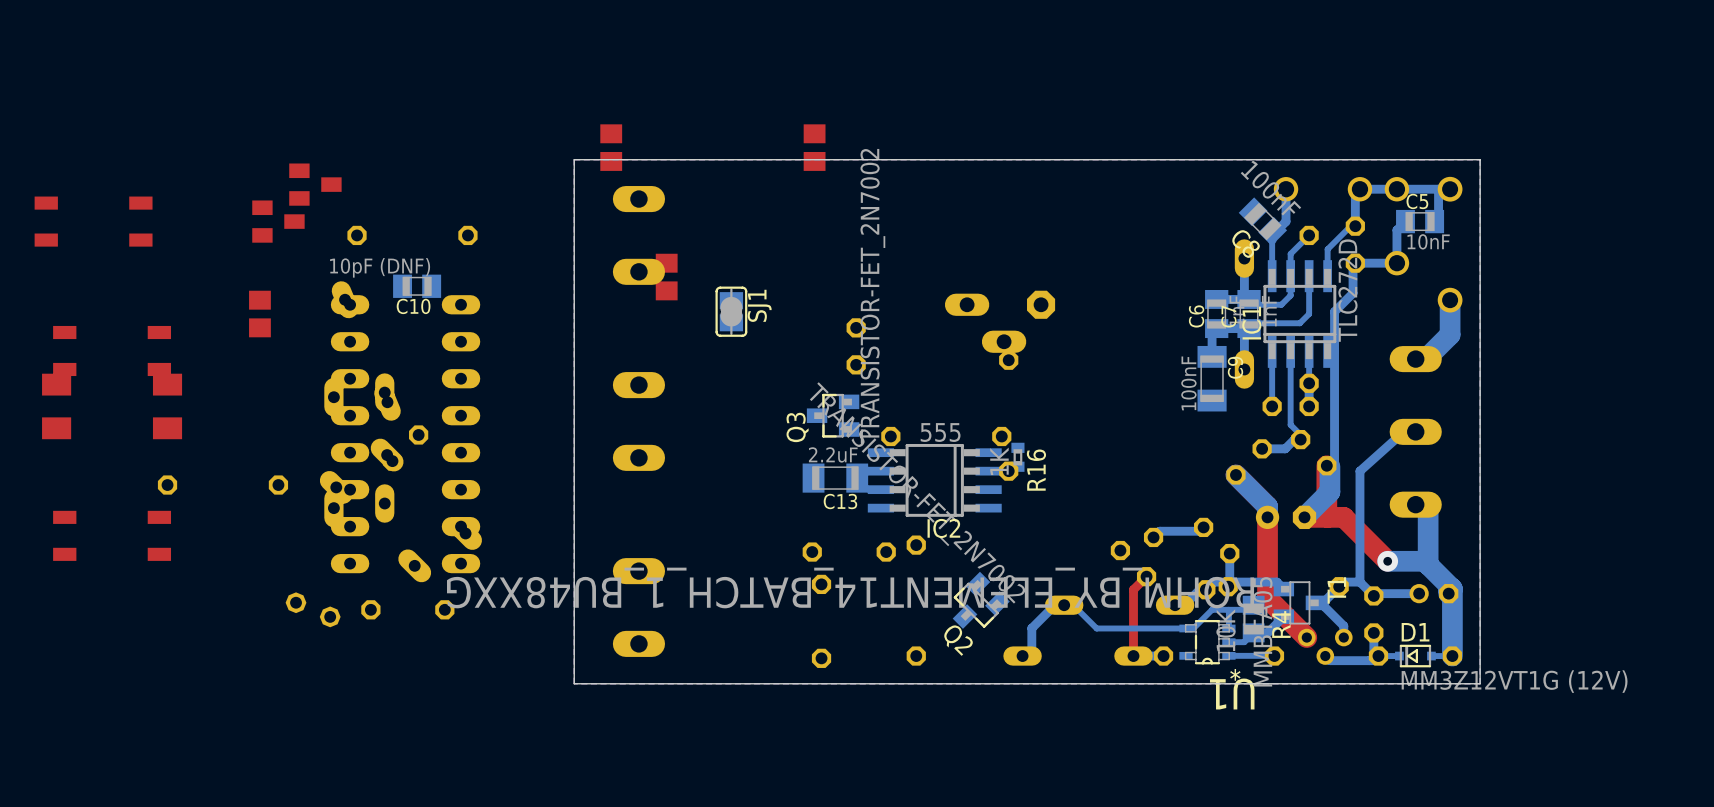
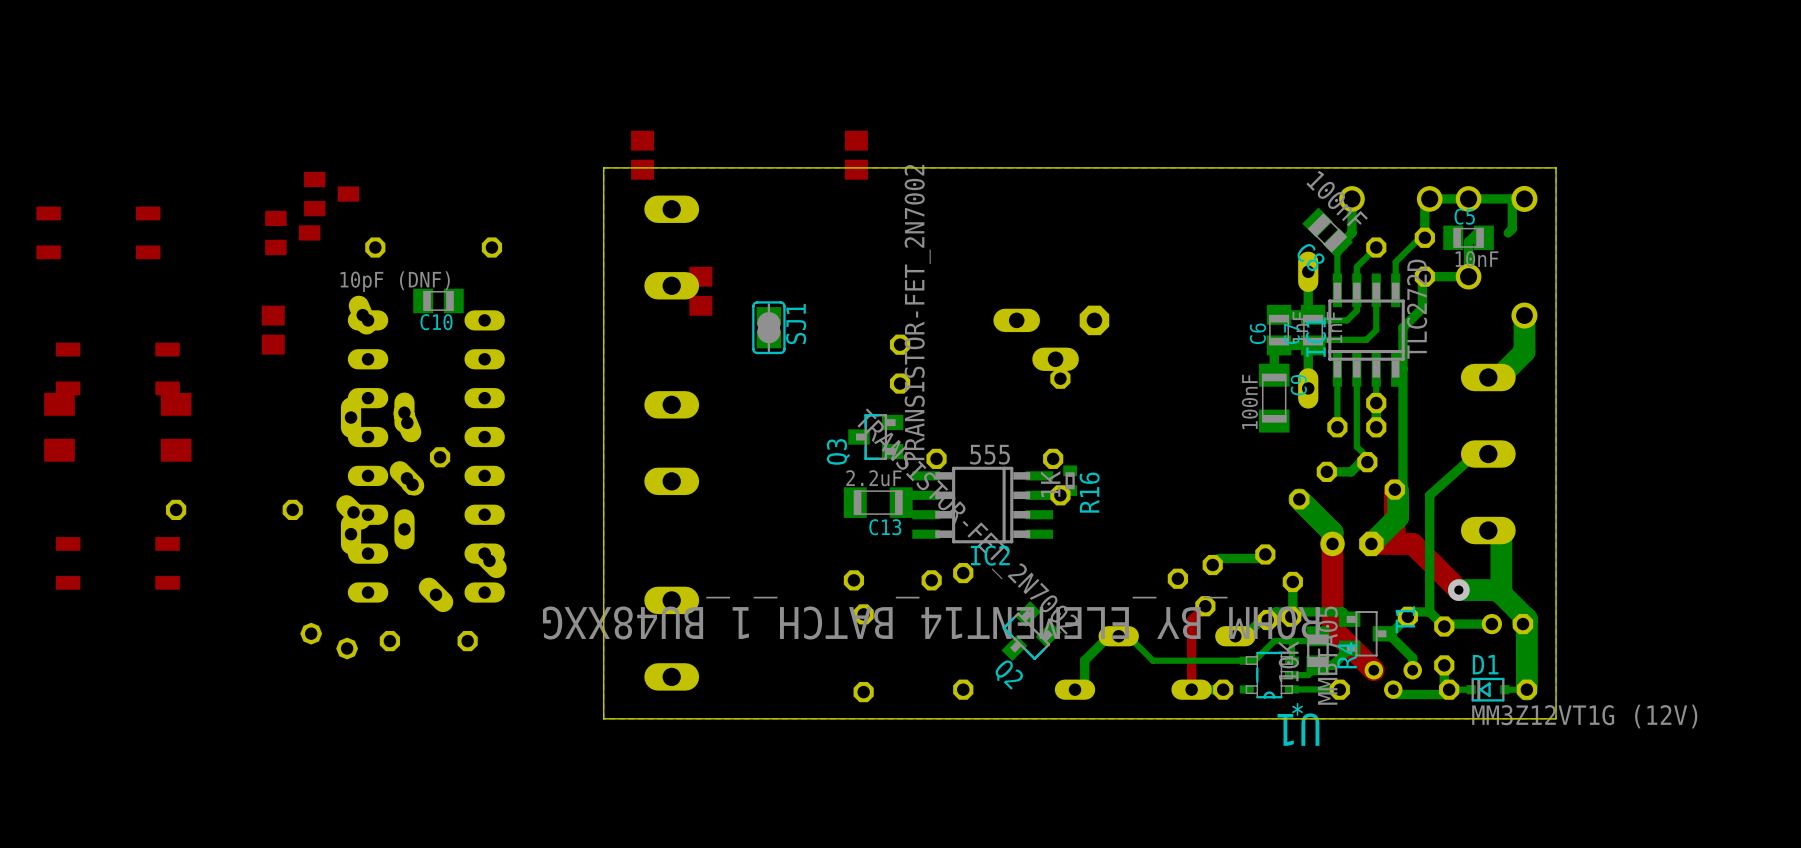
C5 position: (1420, 221) -> (1468, 237)

